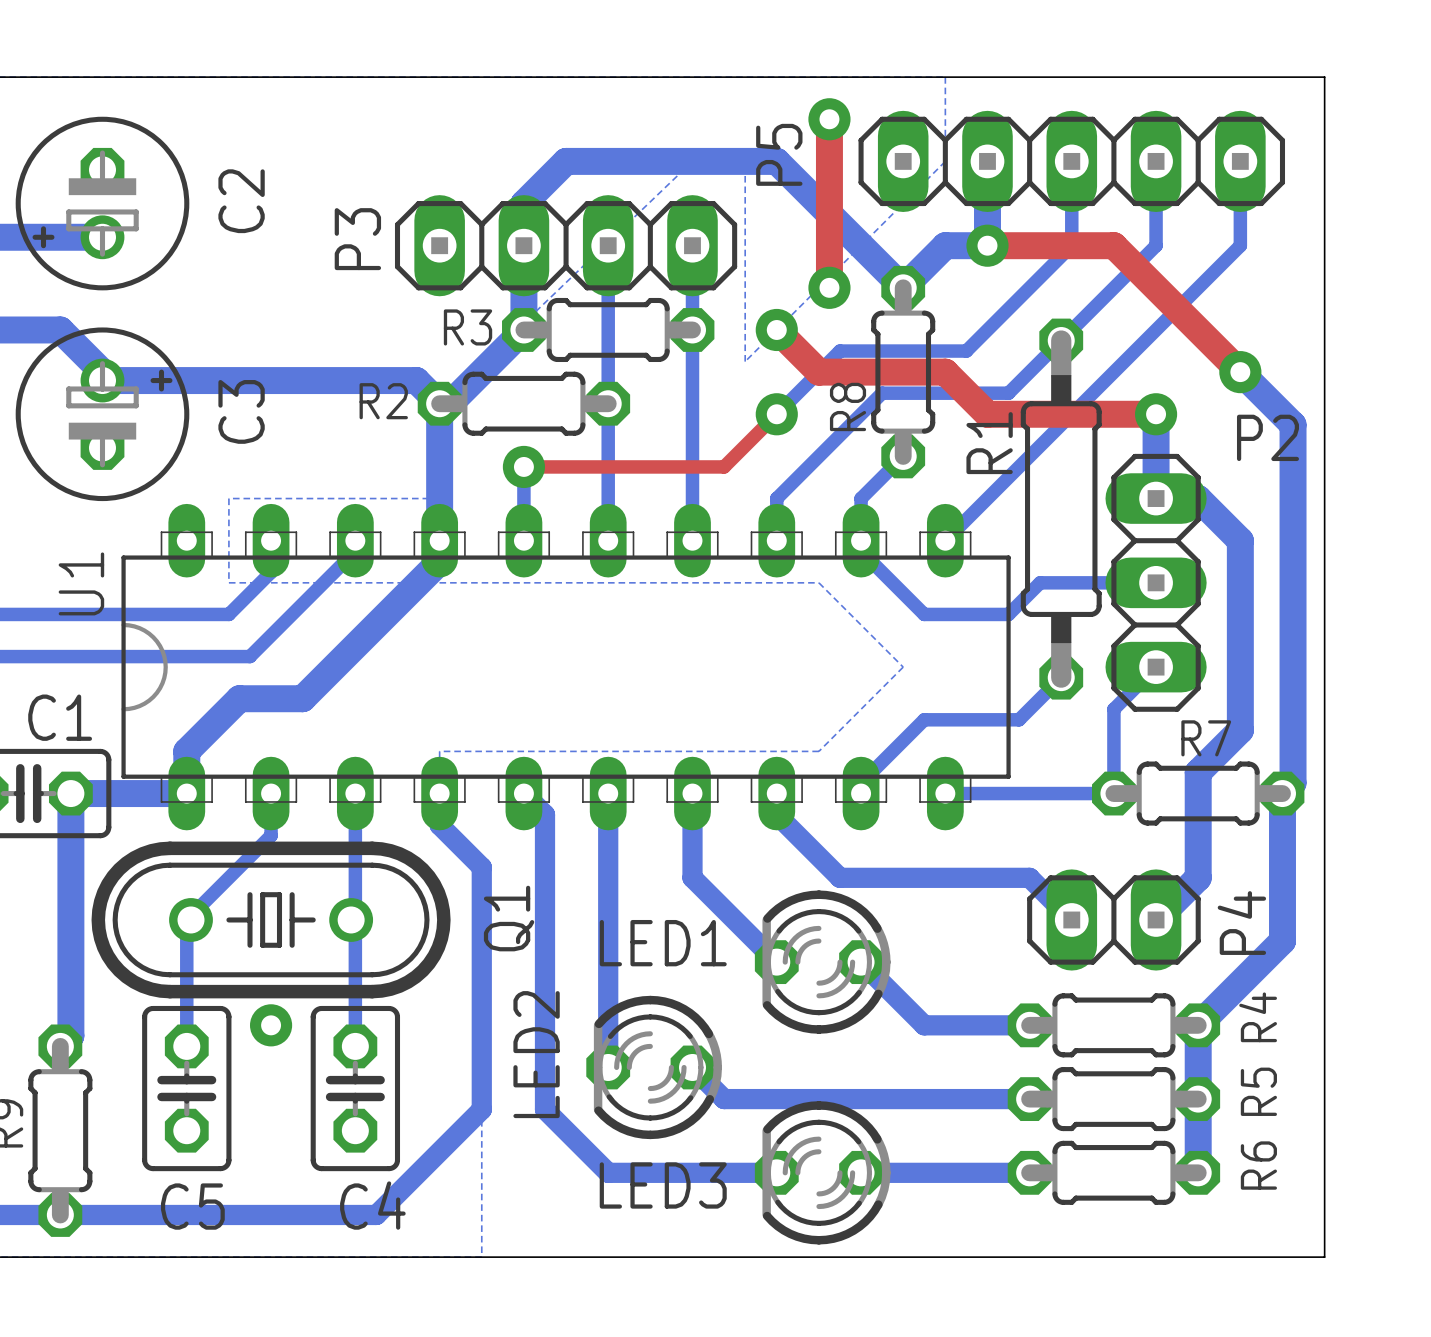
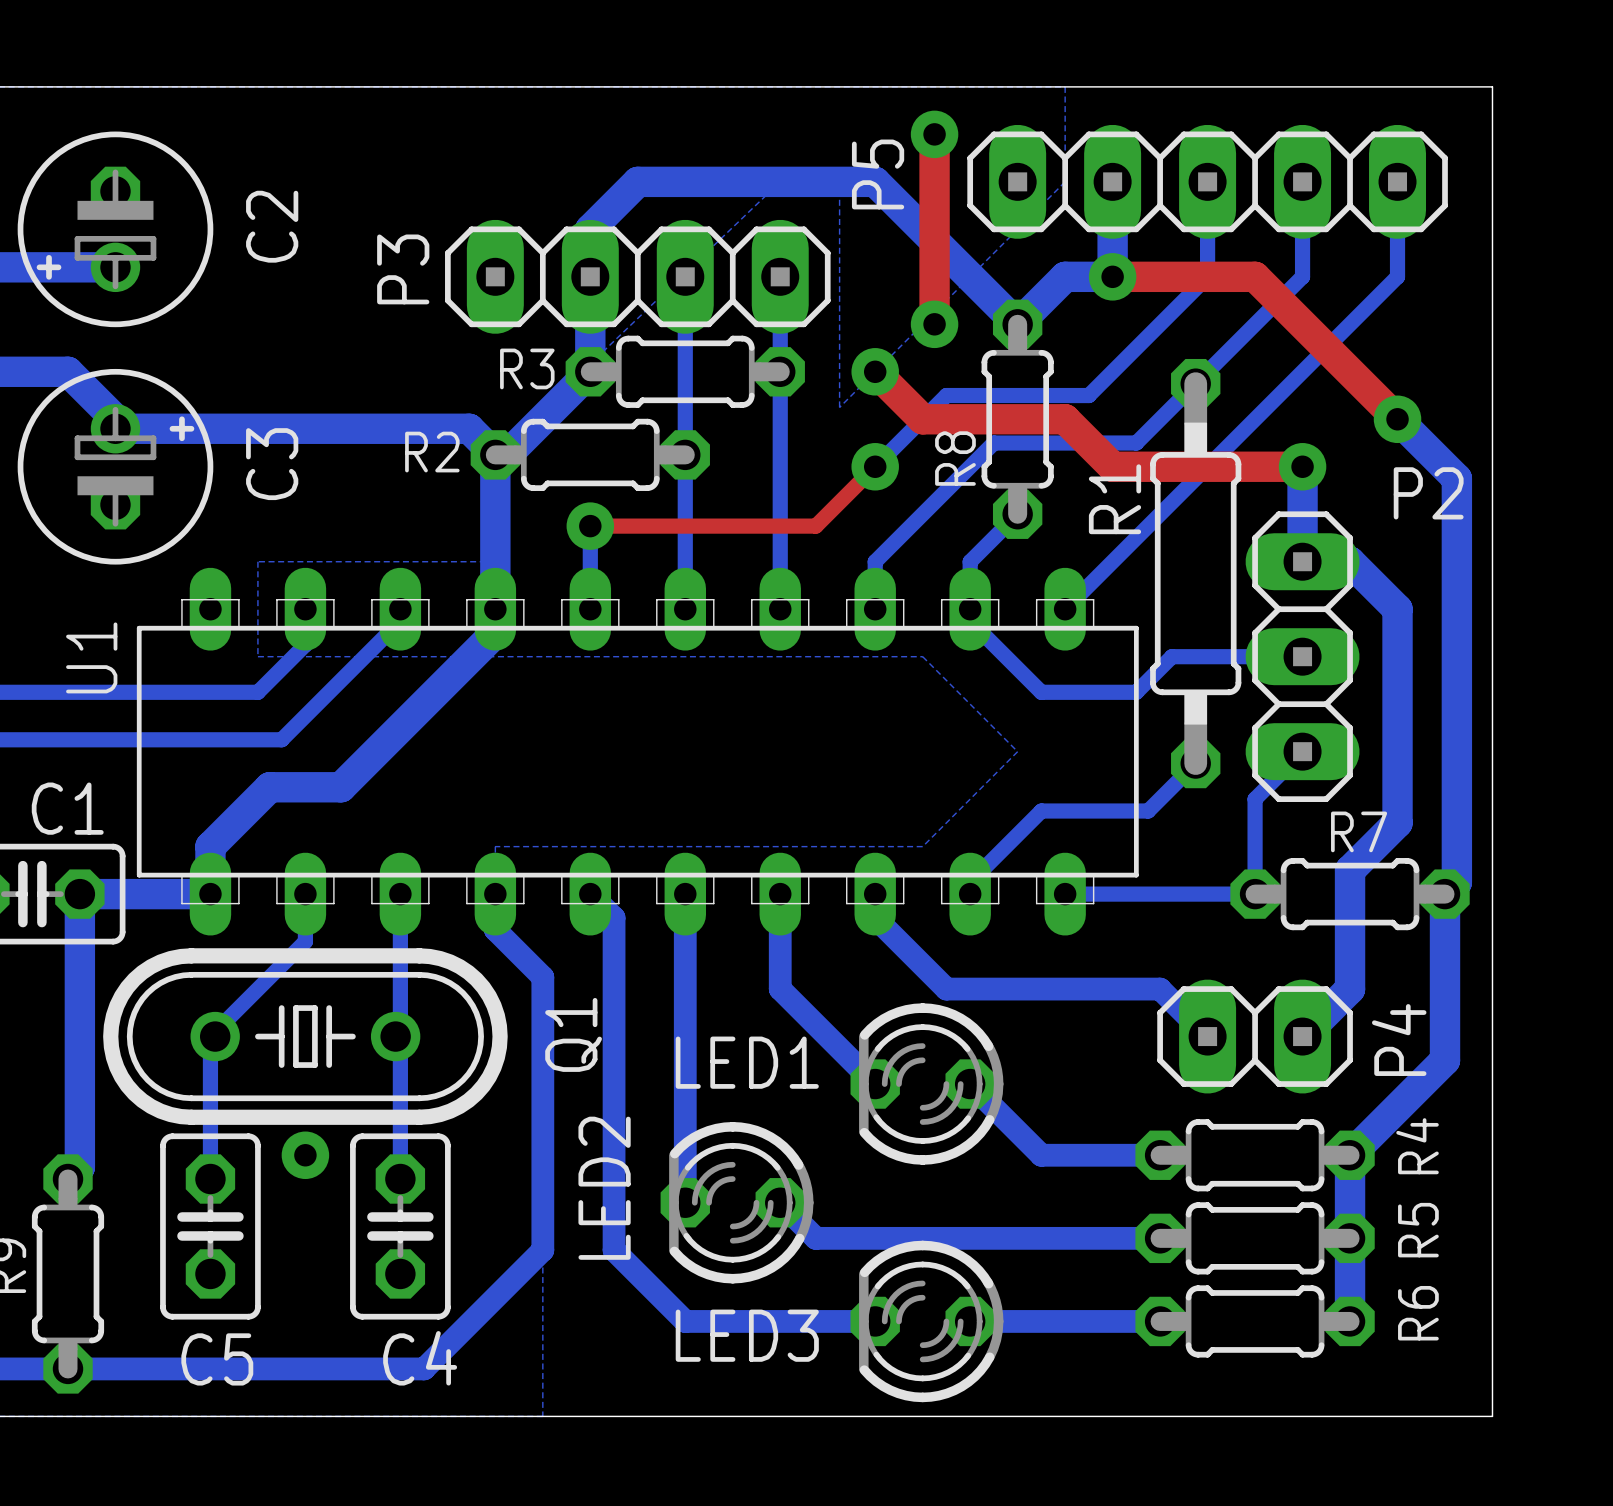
U1 footprint: [121, 503, 1011, 831] -> [136, 567, 1139, 936]

